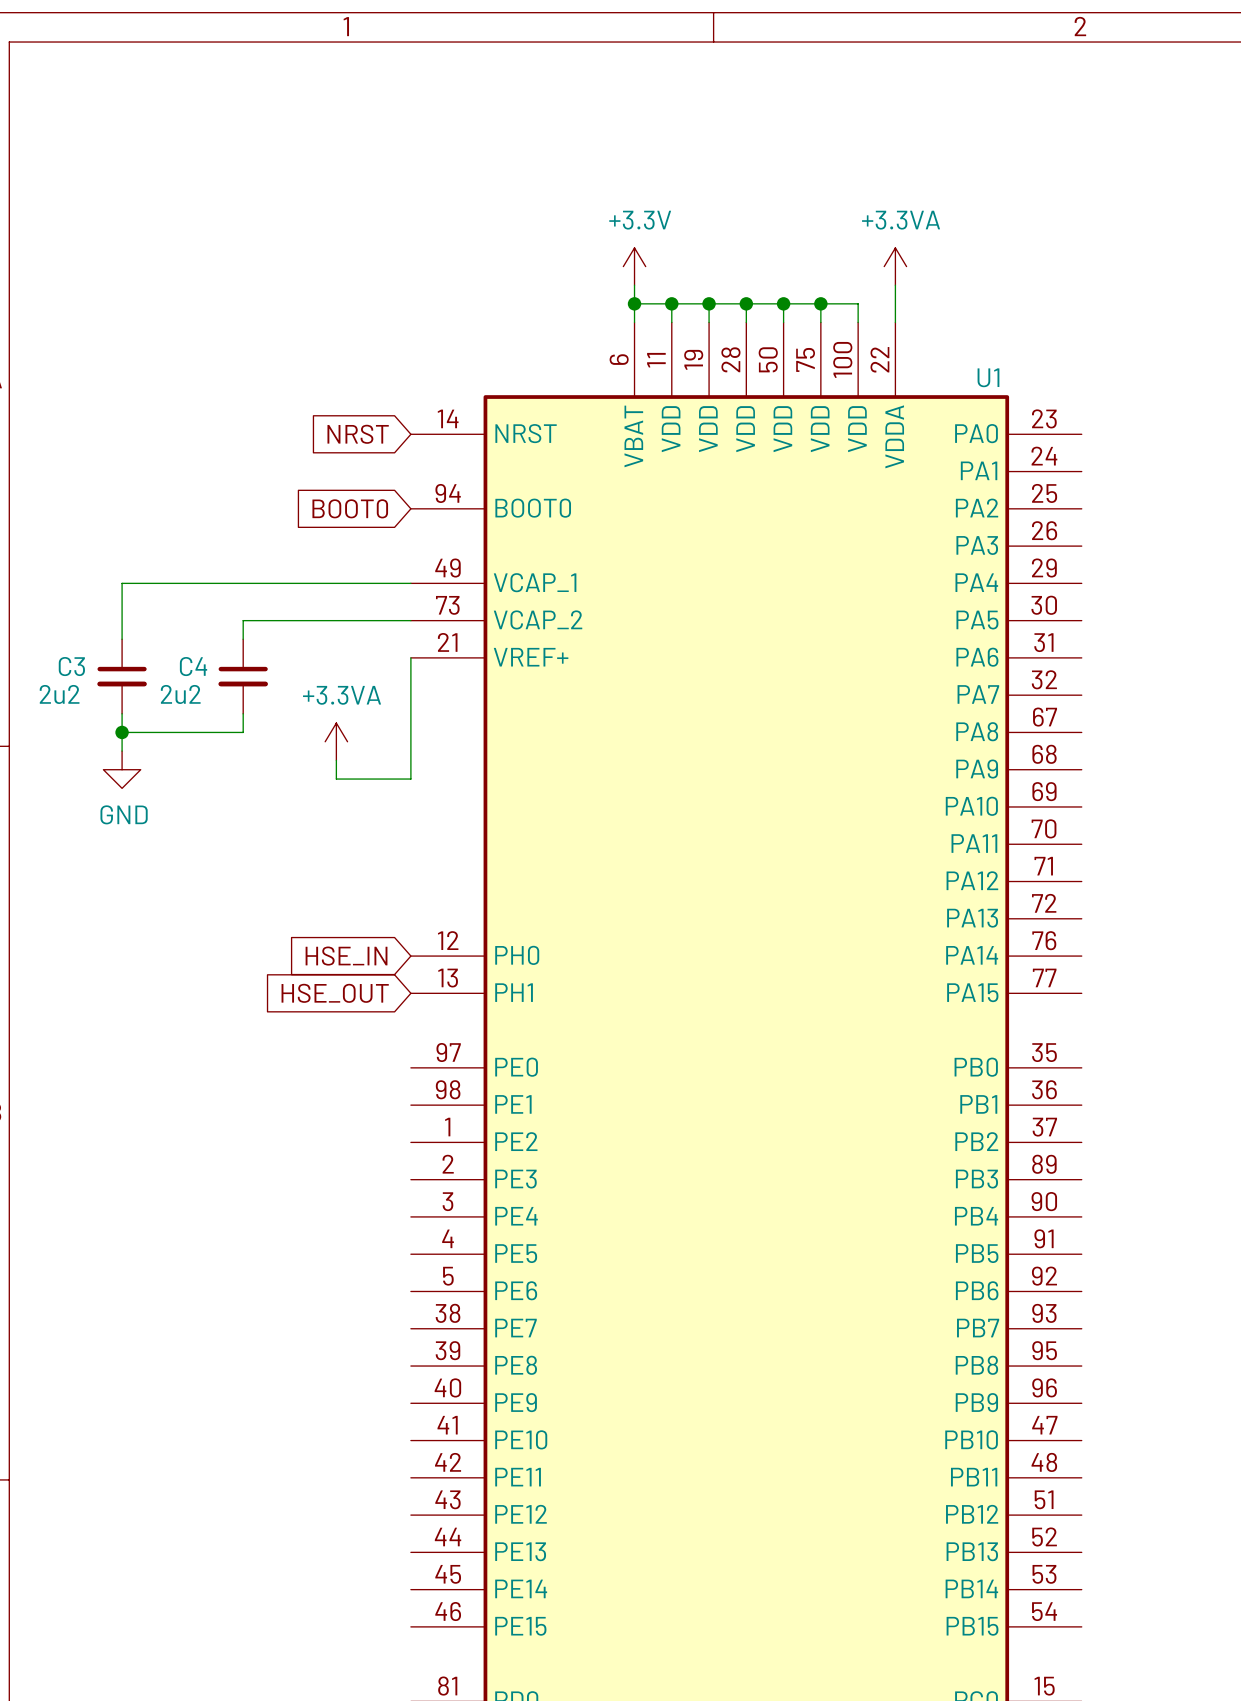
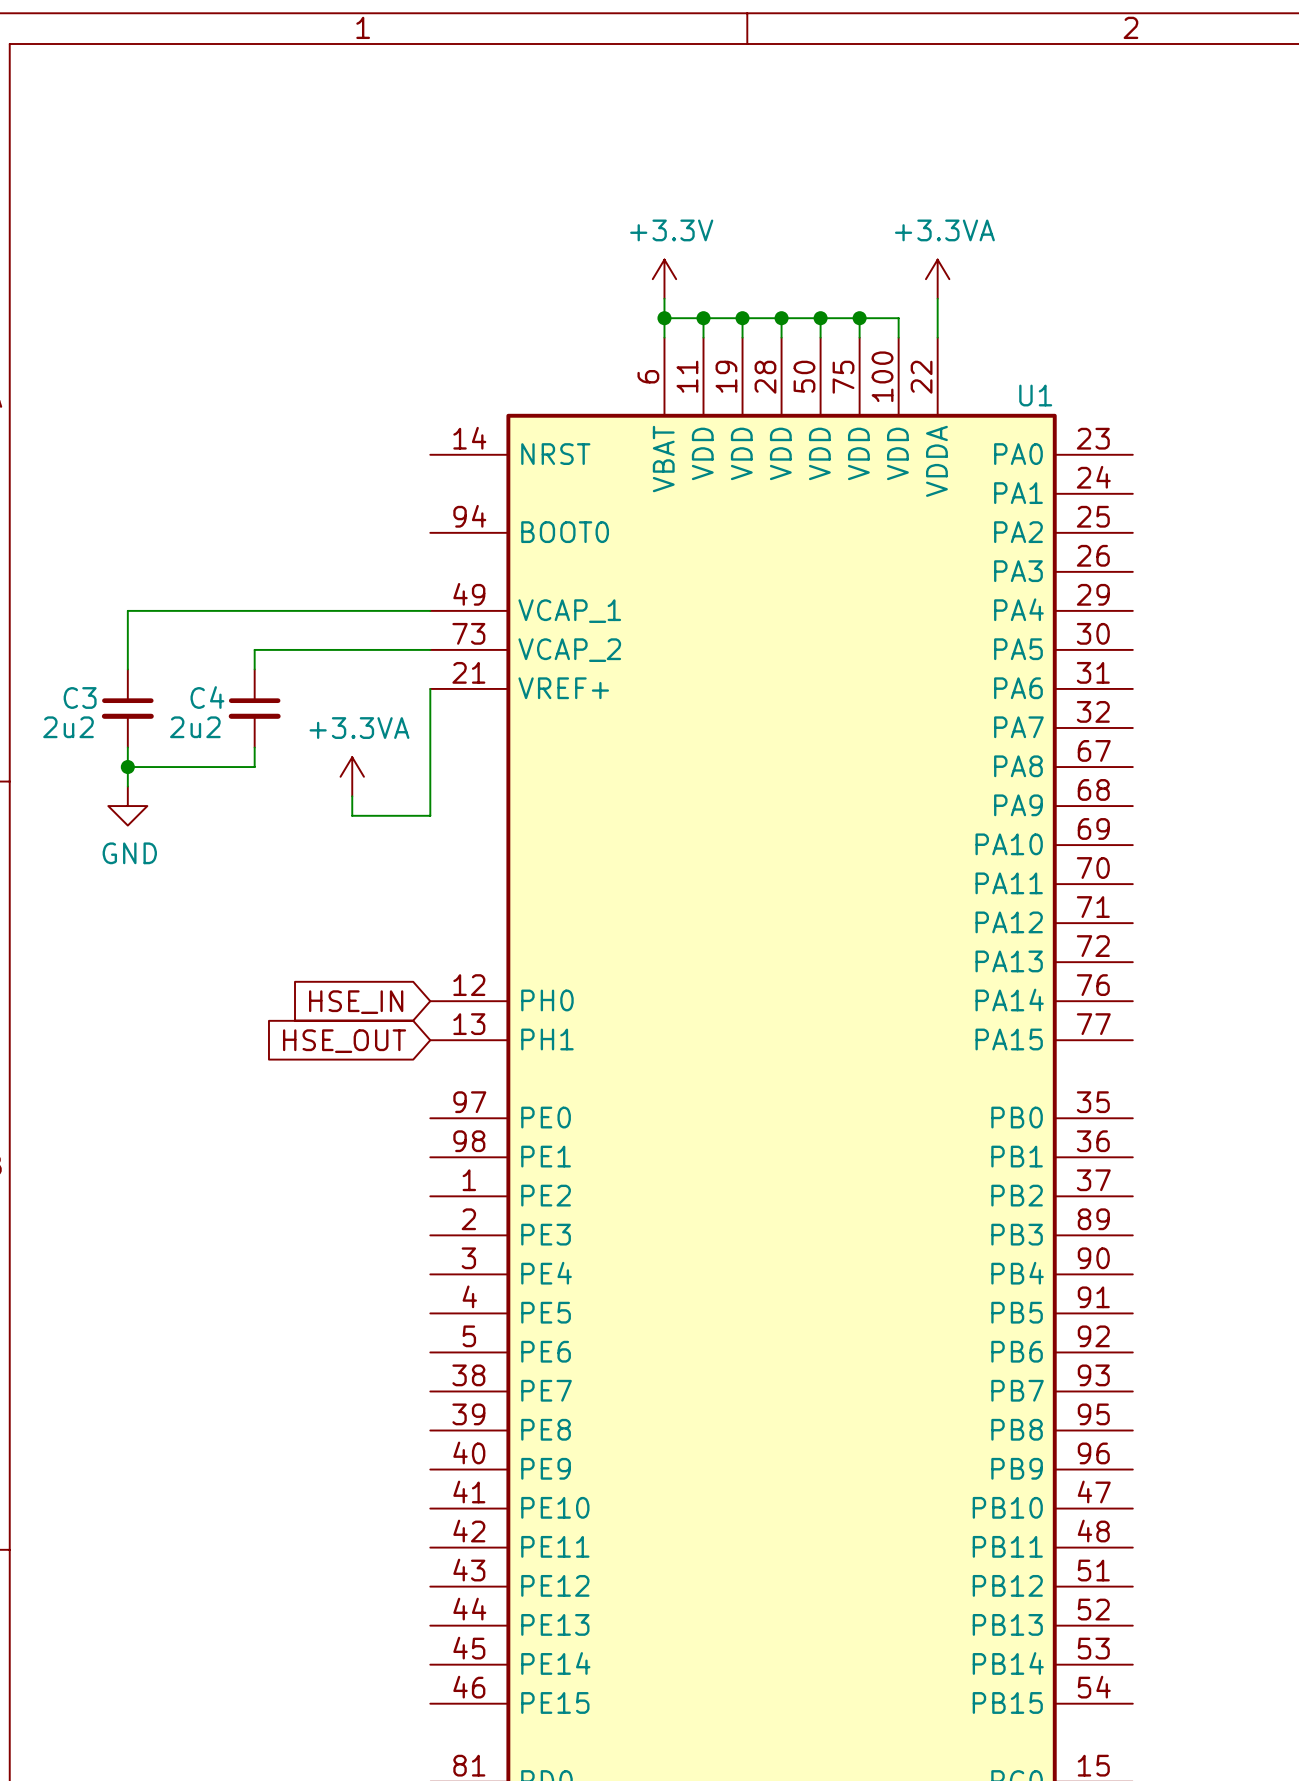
global label: NRST (358, 434) -> none
global label: BOOT0 (350, 508) -> none

